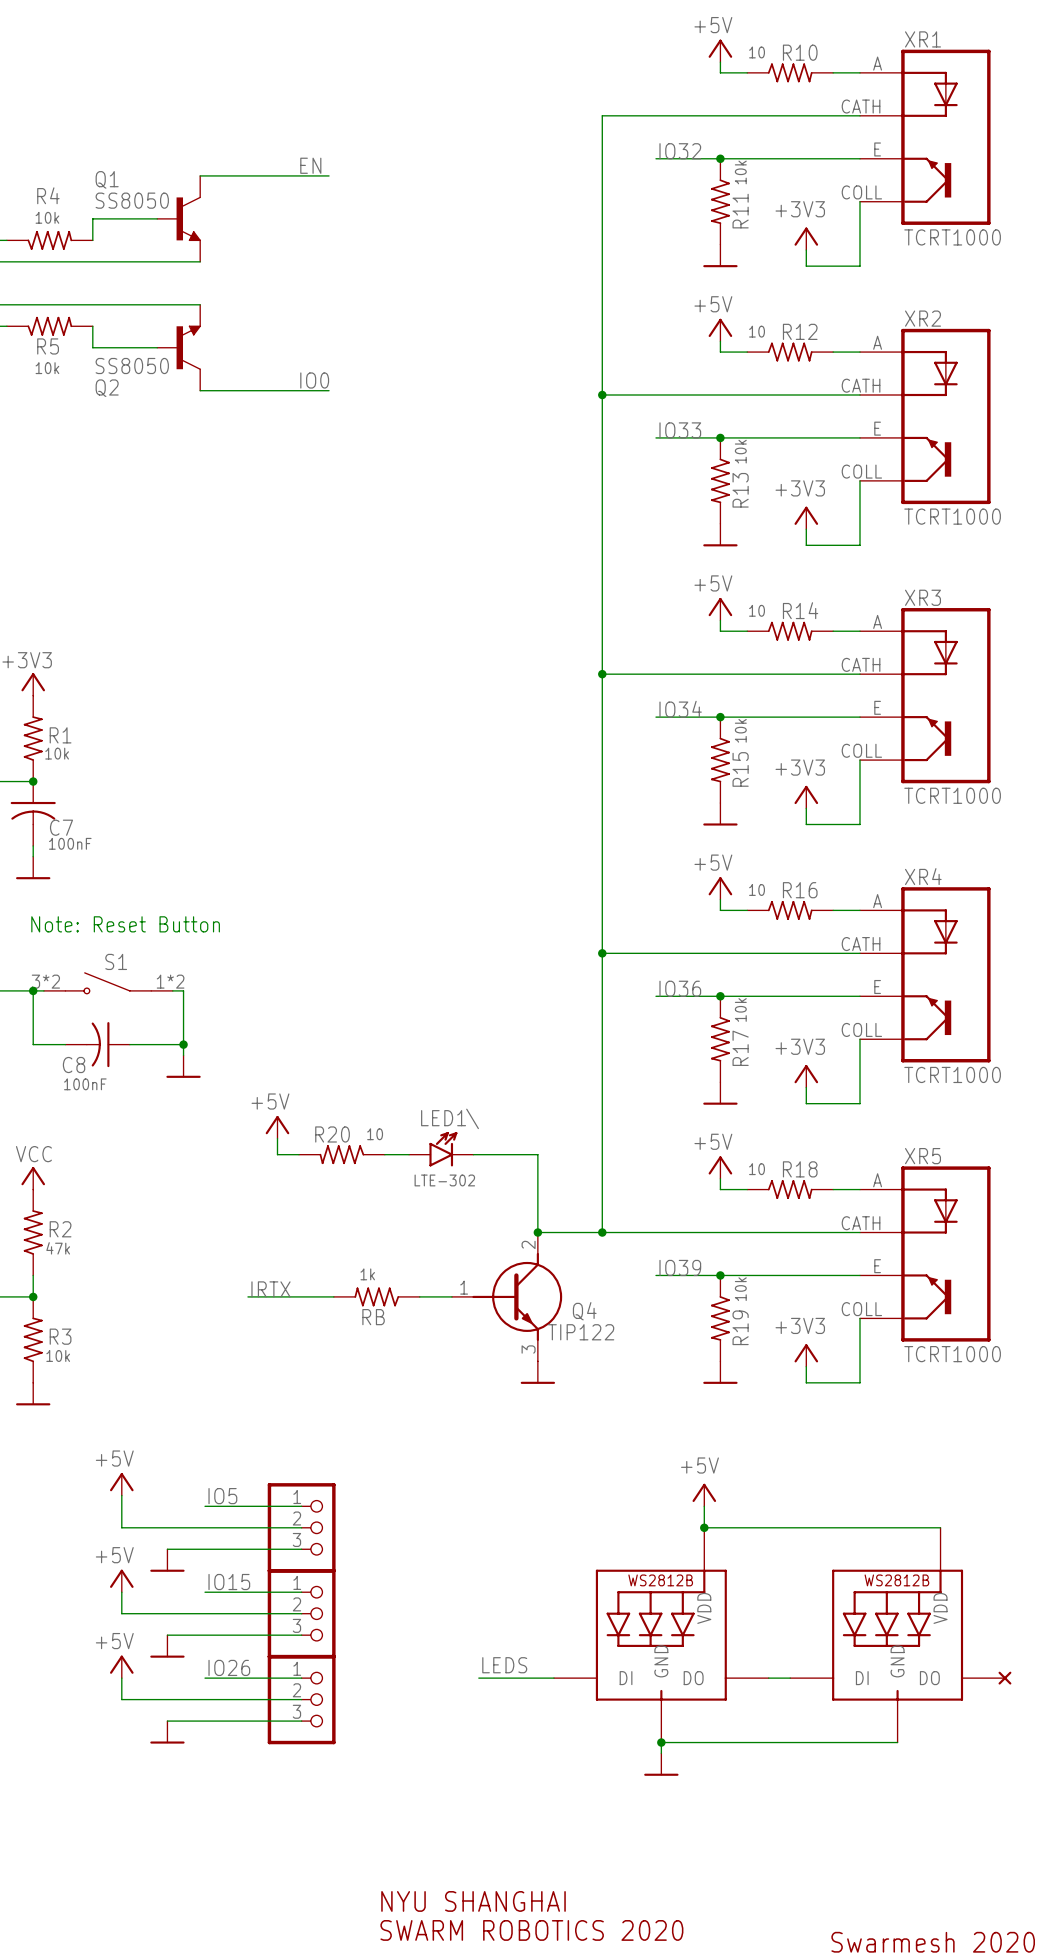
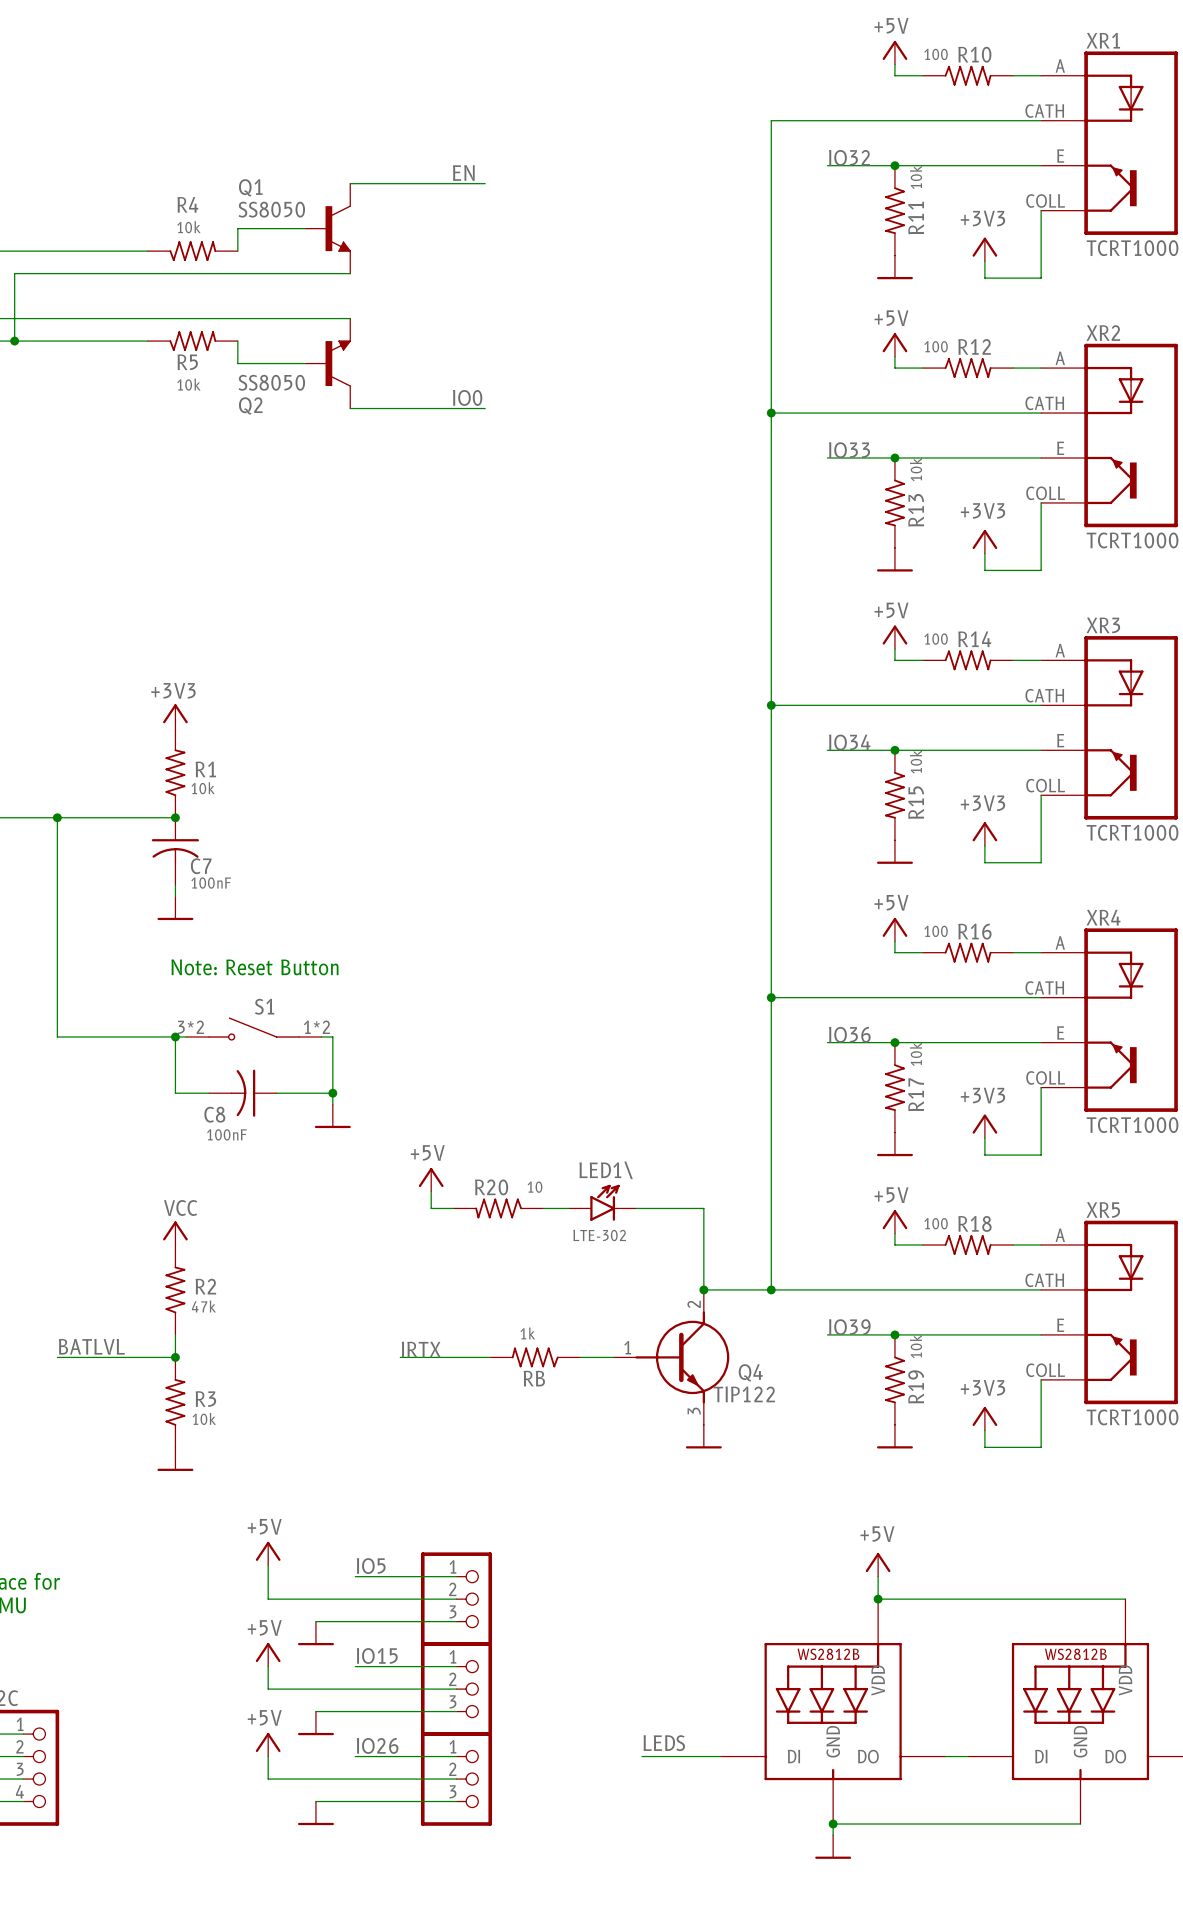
R10 value: 10 (757, 52) -> 100 (936, 54)
R12 value: 10 (757, 331) -> 100 (936, 346)
R14 value: 10 (757, 610) -> 100 (936, 639)
R16 value: 10 (757, 889) -> 100 (936, 931)
R18 value: 10 (757, 1169) -> 100 (936, 1223)

